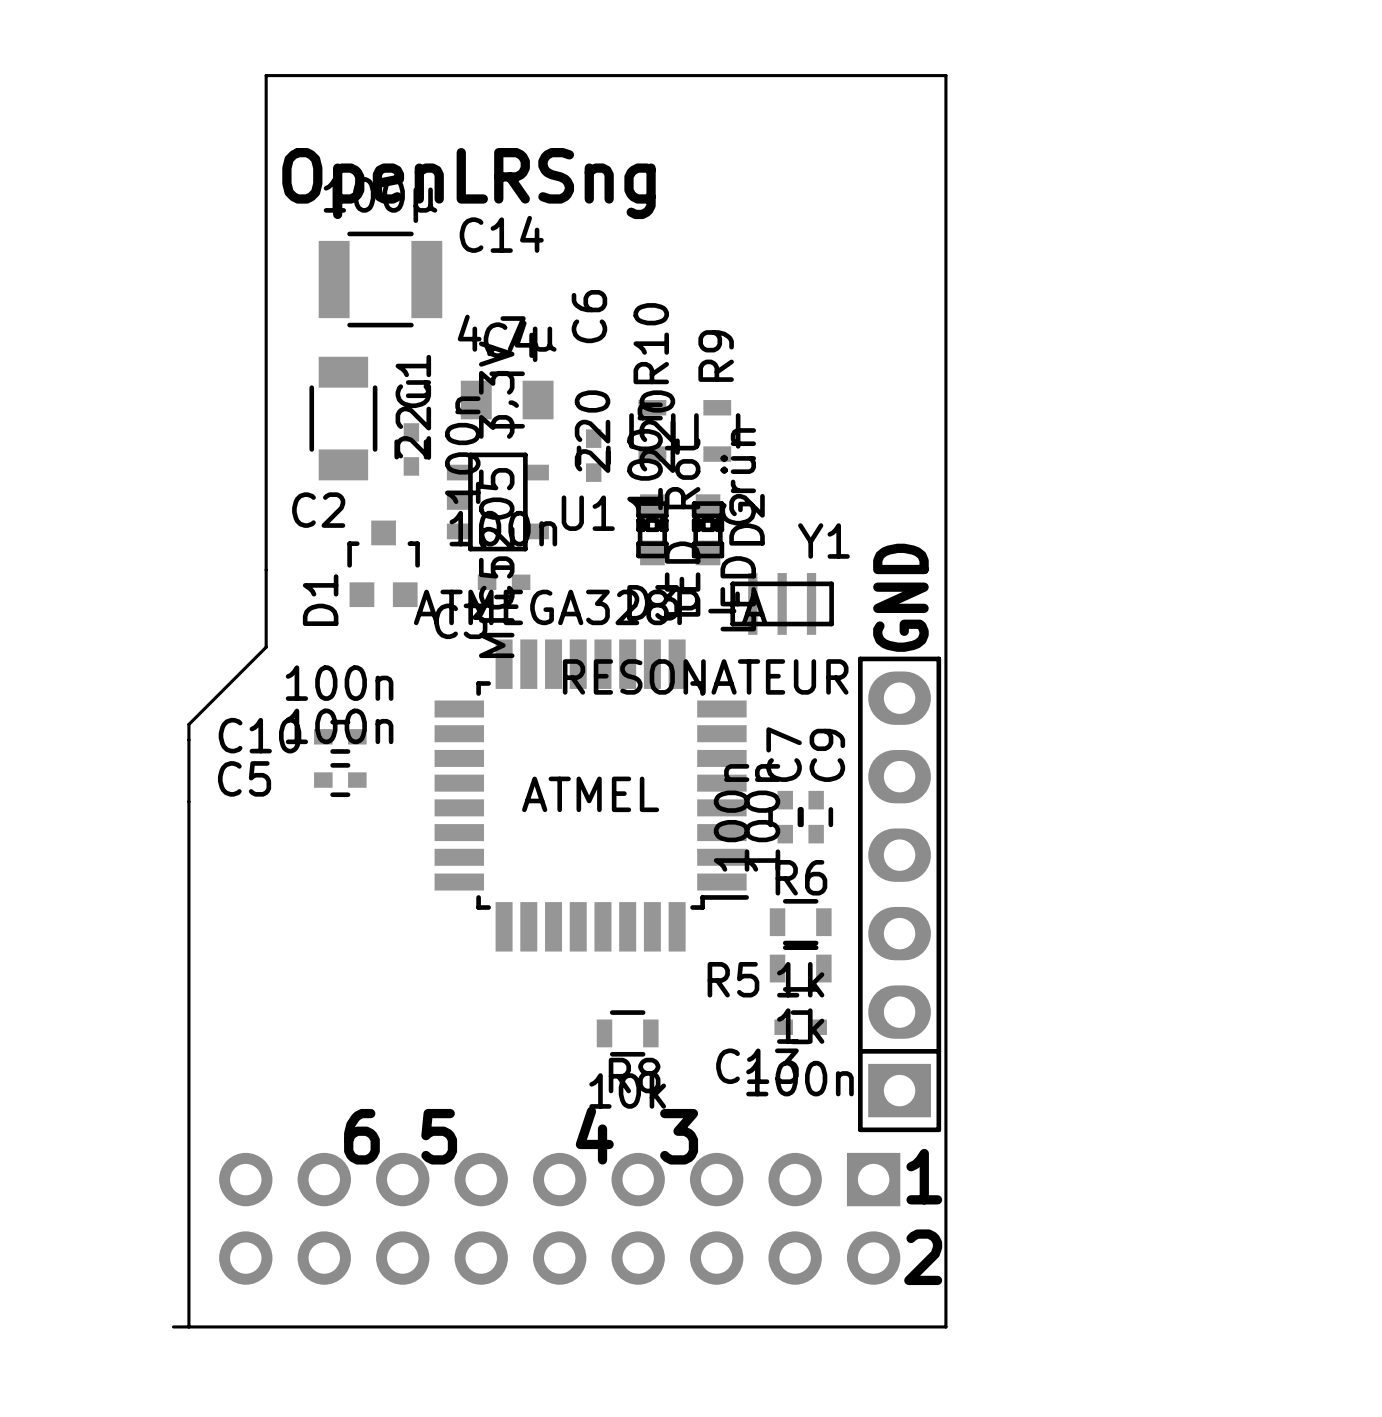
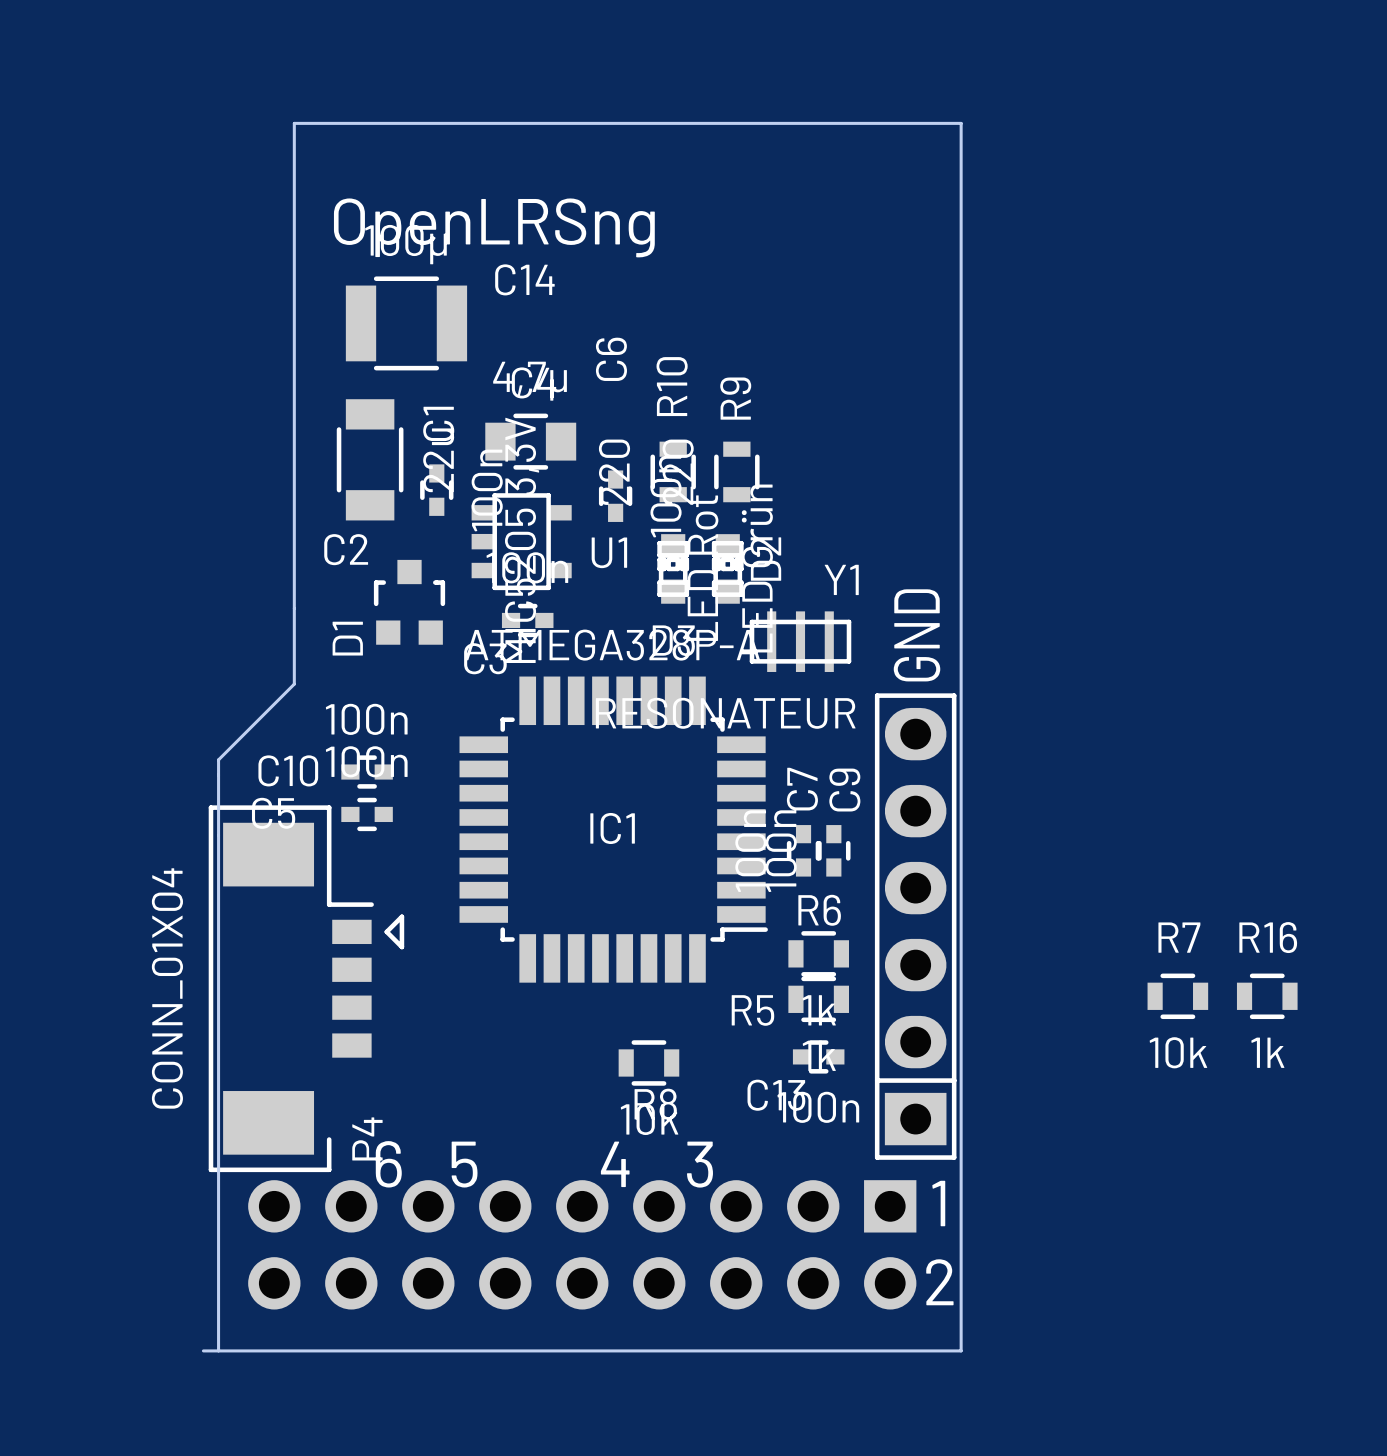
ATMEL name: ATMEL (590, 794) -> IC1 (612, 828)
P4: none -> CONN_01X04 (306, 988)
R7: none -> 10k (1177, 996)
R16: none -> 1k (1267, 996)

